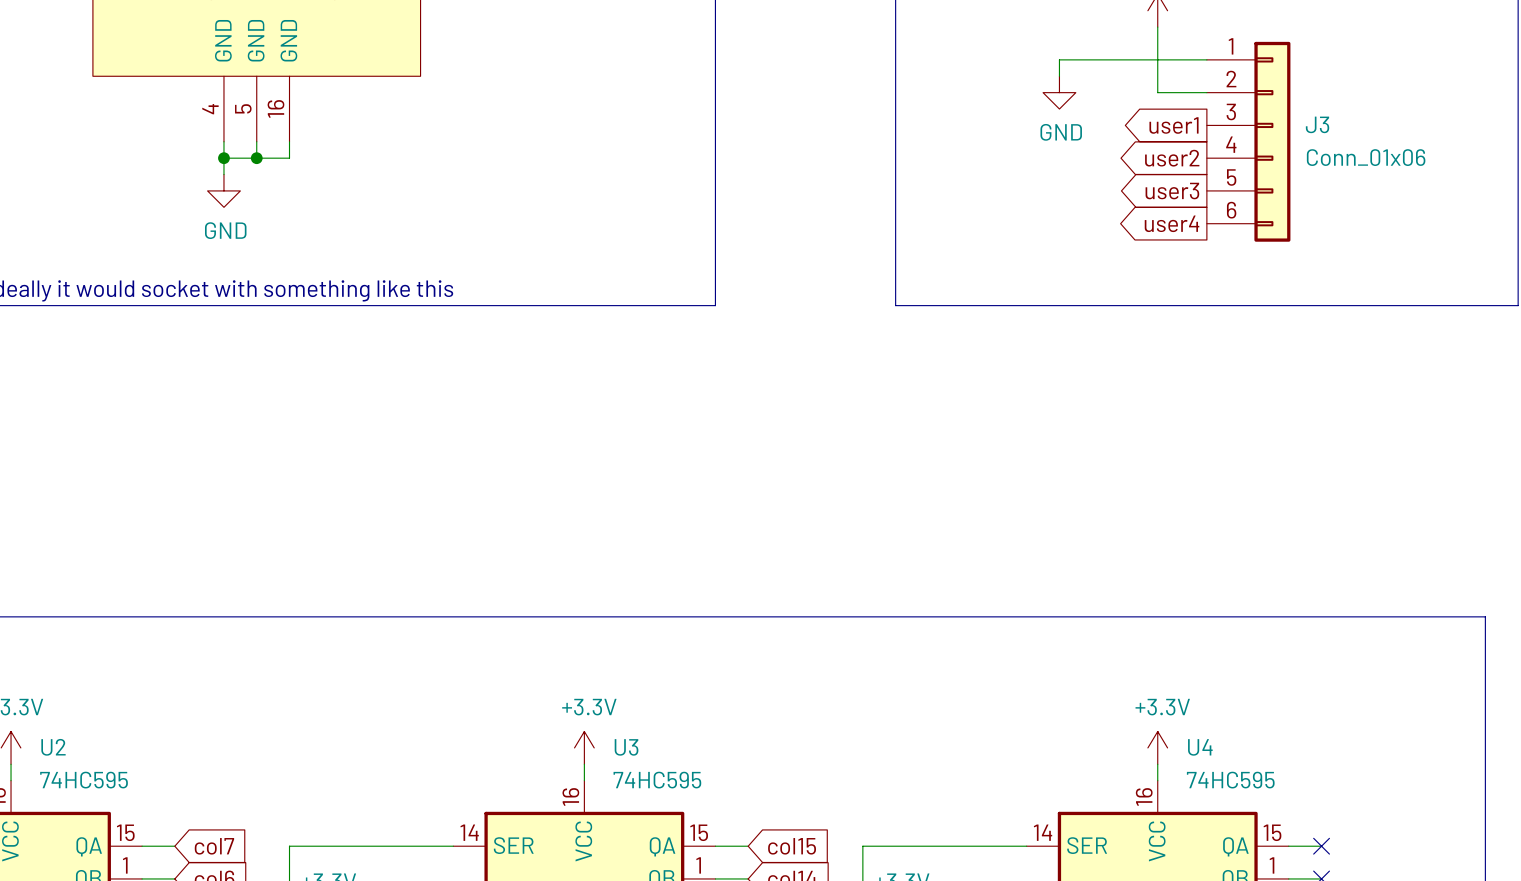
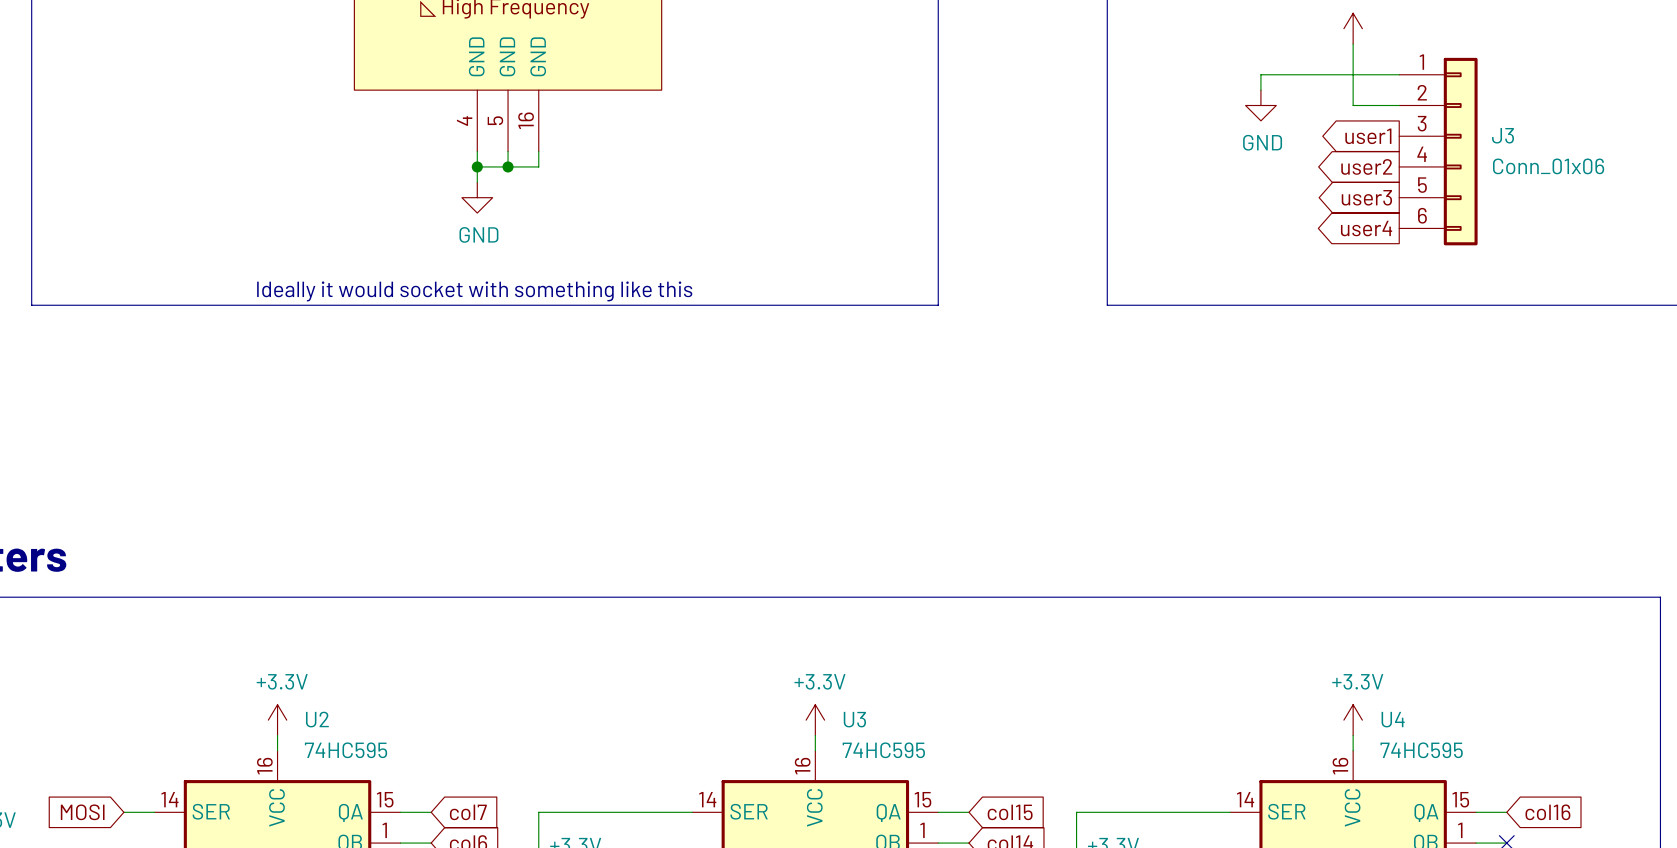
no-connect mark: (1321, 846) -> none
global label: none -> col16 (1547, 812)

